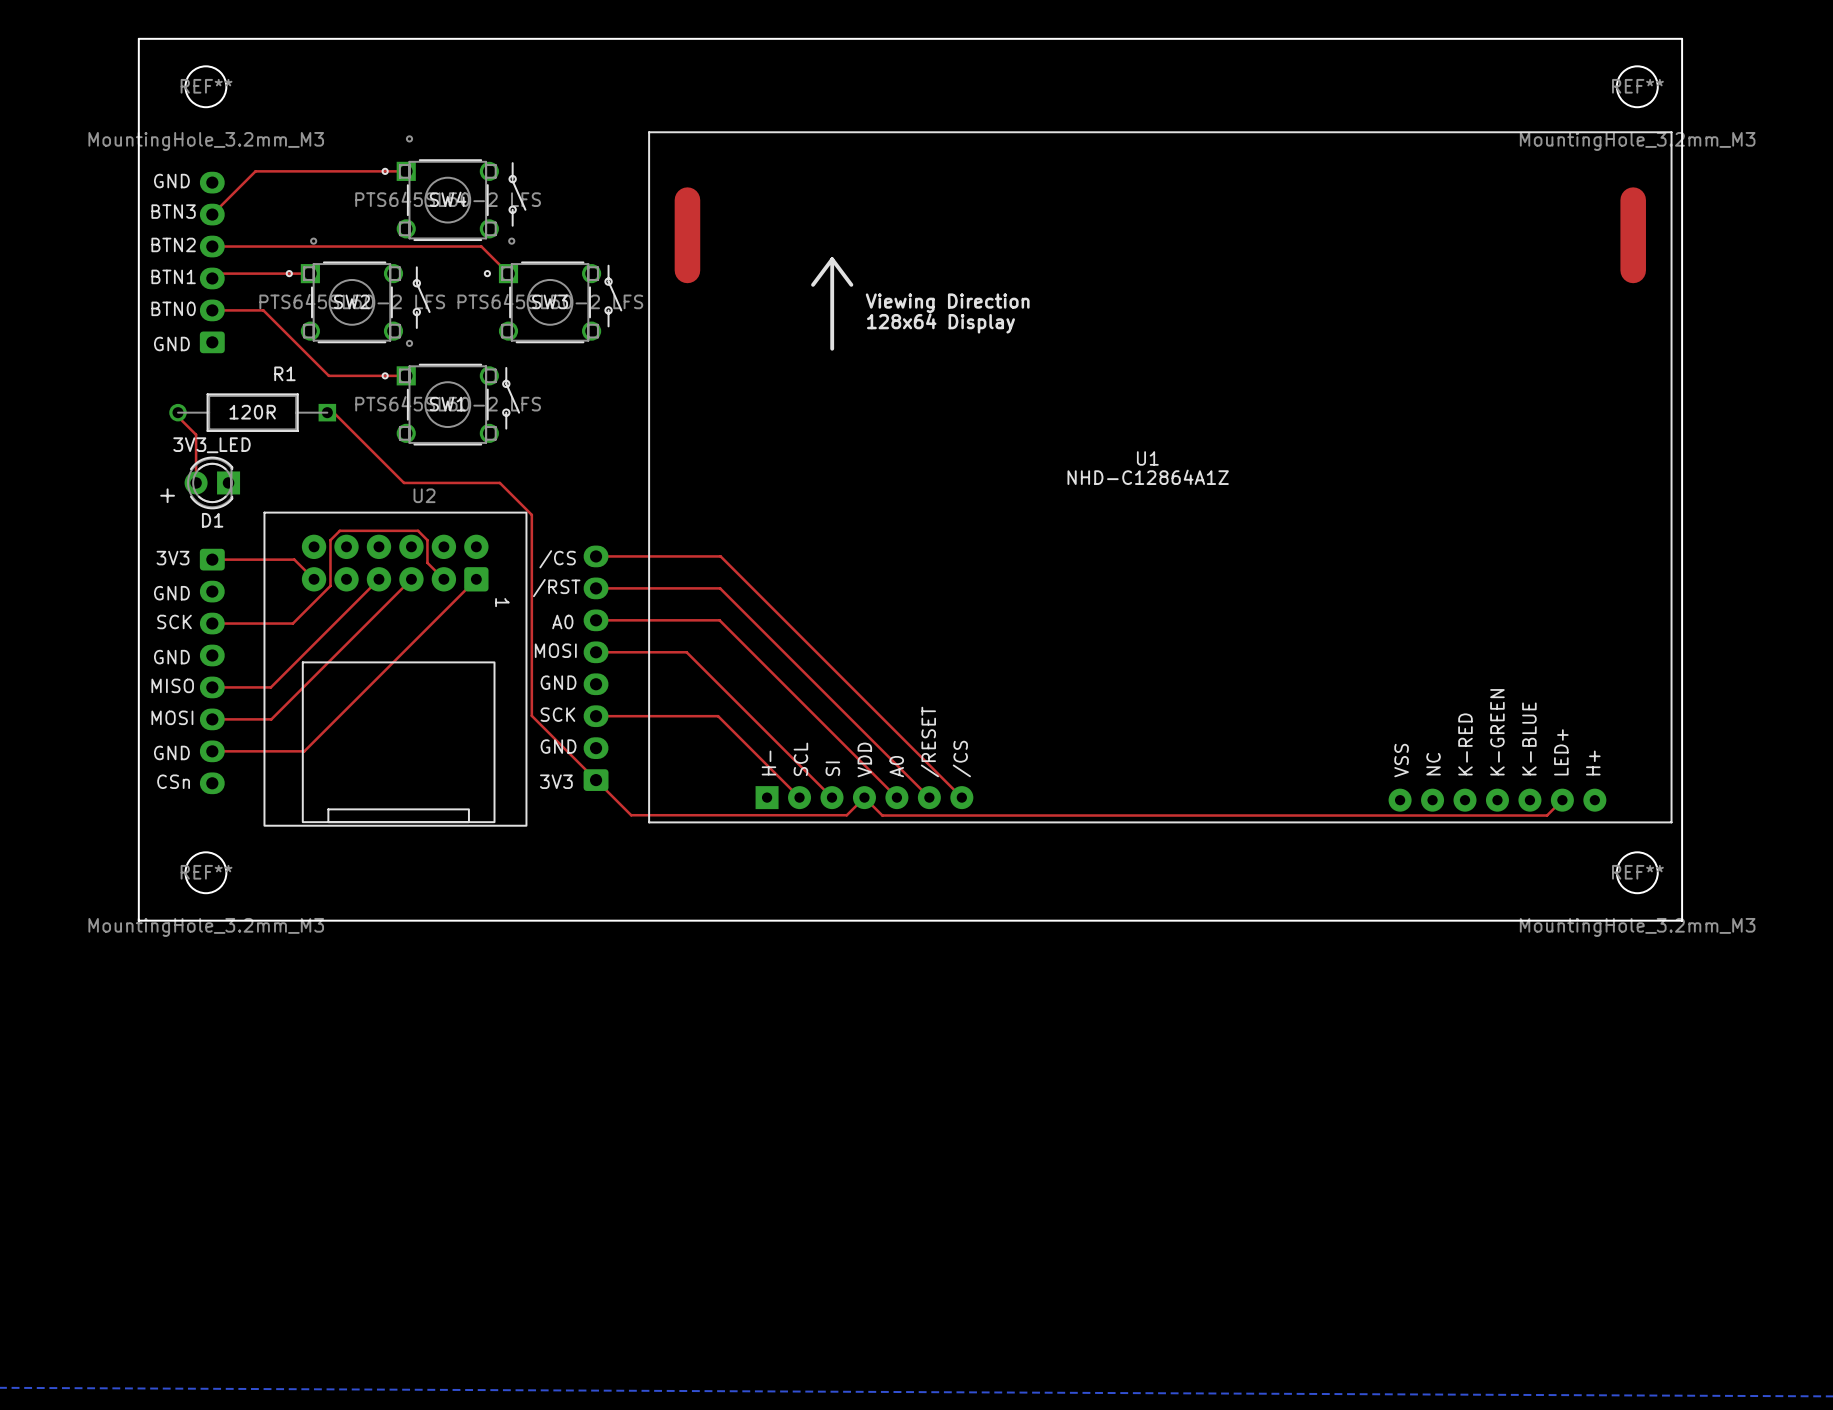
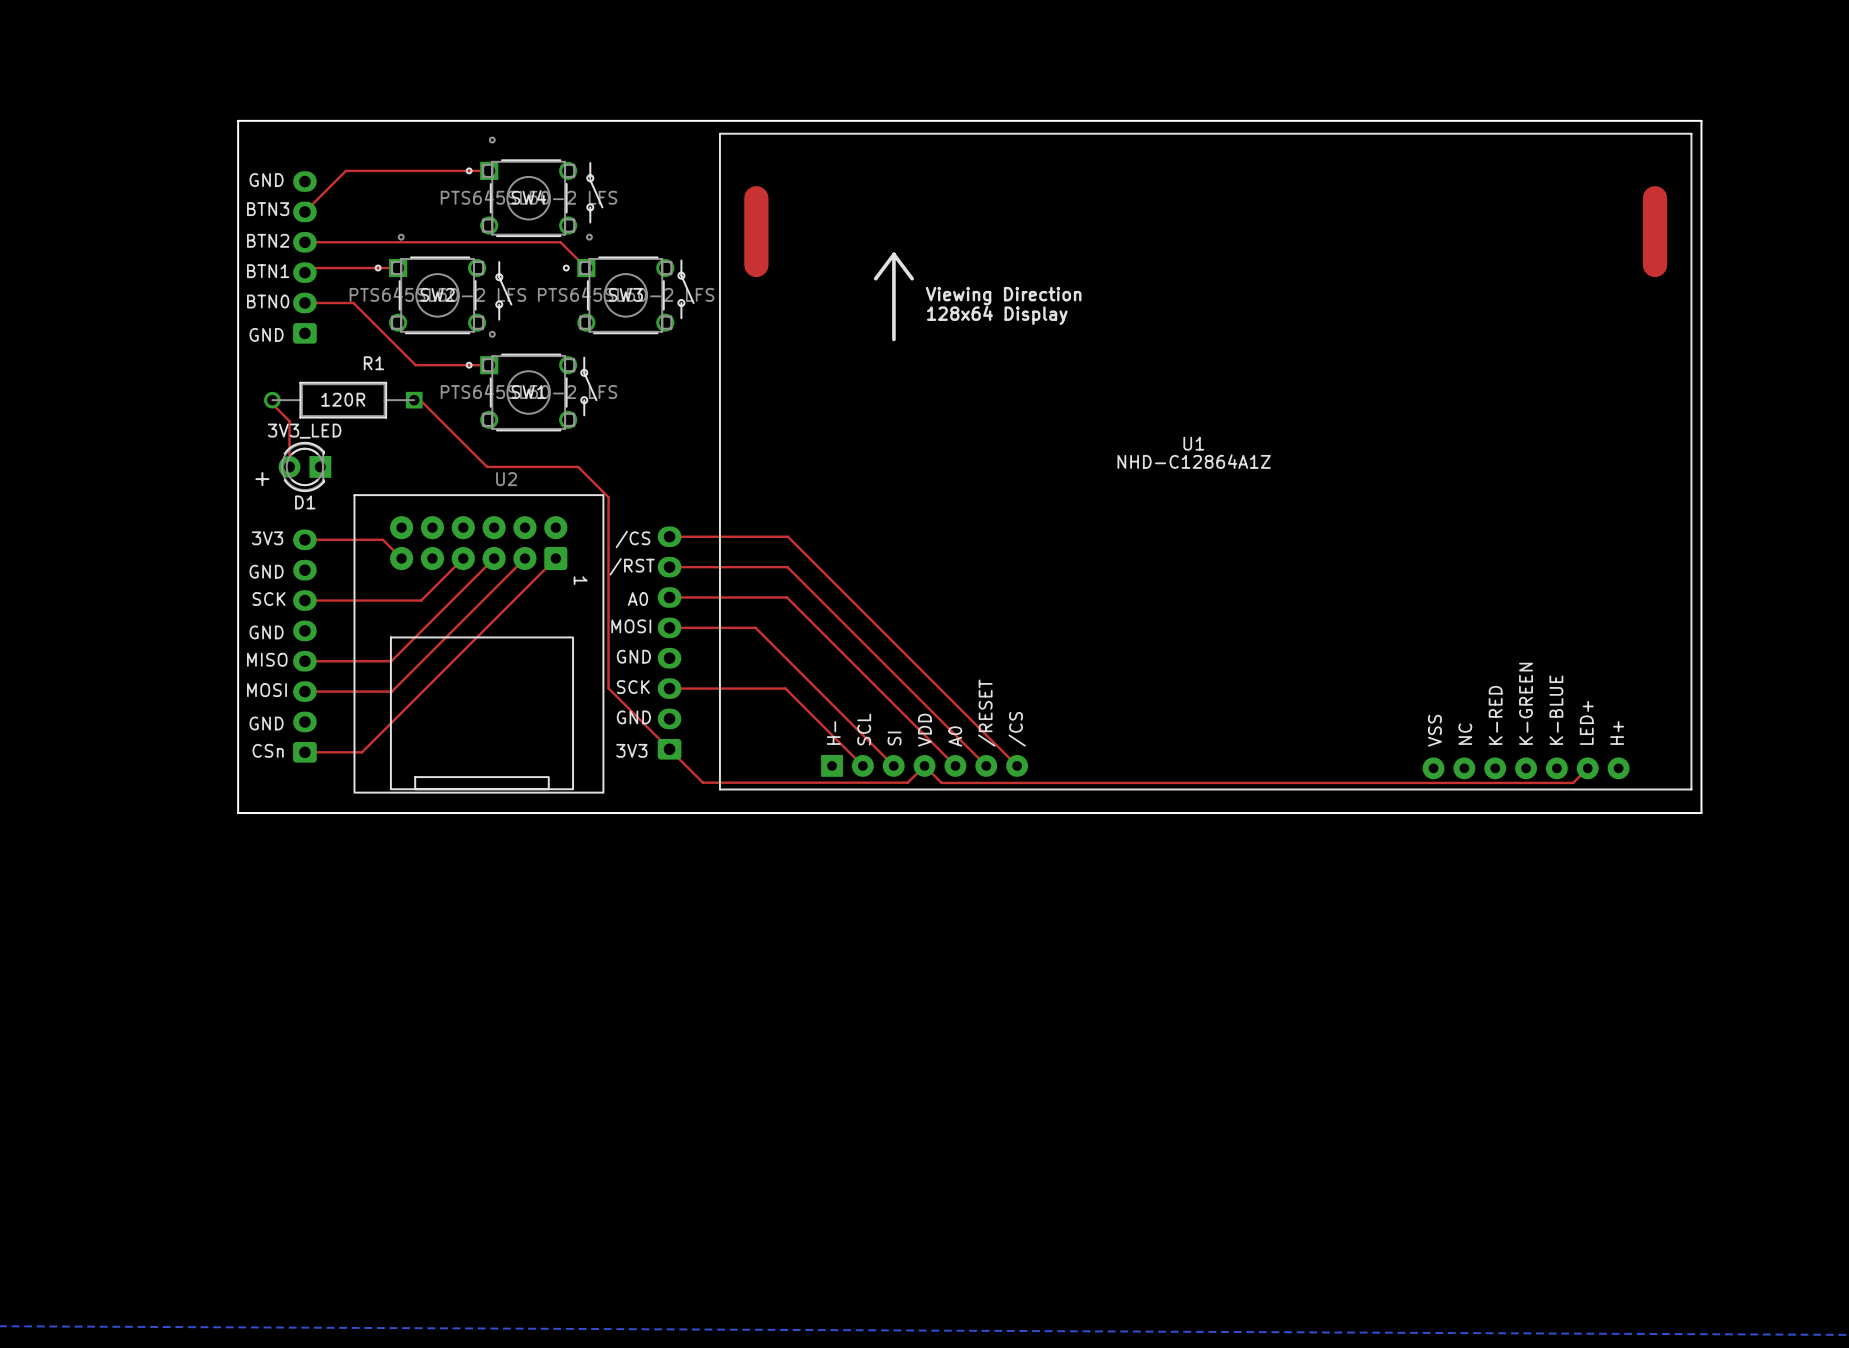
REF**: MountingHole_3.2mm_M3 (205, 86) -> none
REF**: MountingHole_3.2mm_M3 (1637, 86) -> none
board edge: (1682, 118) (1682, 38) (138, 38) (138, 920) (1682, 920) (1682, 847) -> (1701, 120) (238, 120) (238, 813) (1701, 813)
top track: (443, 579) (427, 562) (427, 540) (418, 530) (339, 530) (330, 540) (330, 585) (292, 623) -> (524, 558) (391, 691) (361, 691)
top track: (334, 623) (270, 687) -> (421, 600) (381, 600)
part rotation: 0° (212, 671) -> 180° (304, 646)
top track: (303, 687) (271, 719) -> (391, 661) (360, 661)
top track: (212, 751) (304, 751) -> (304, 752) (362, 752) (392, 721)
REF**: MountingHole_3.2mm_M3 (205, 872) -> none
REF**: MountingHole_3.2mm_M3 (1637, 872) -> none

